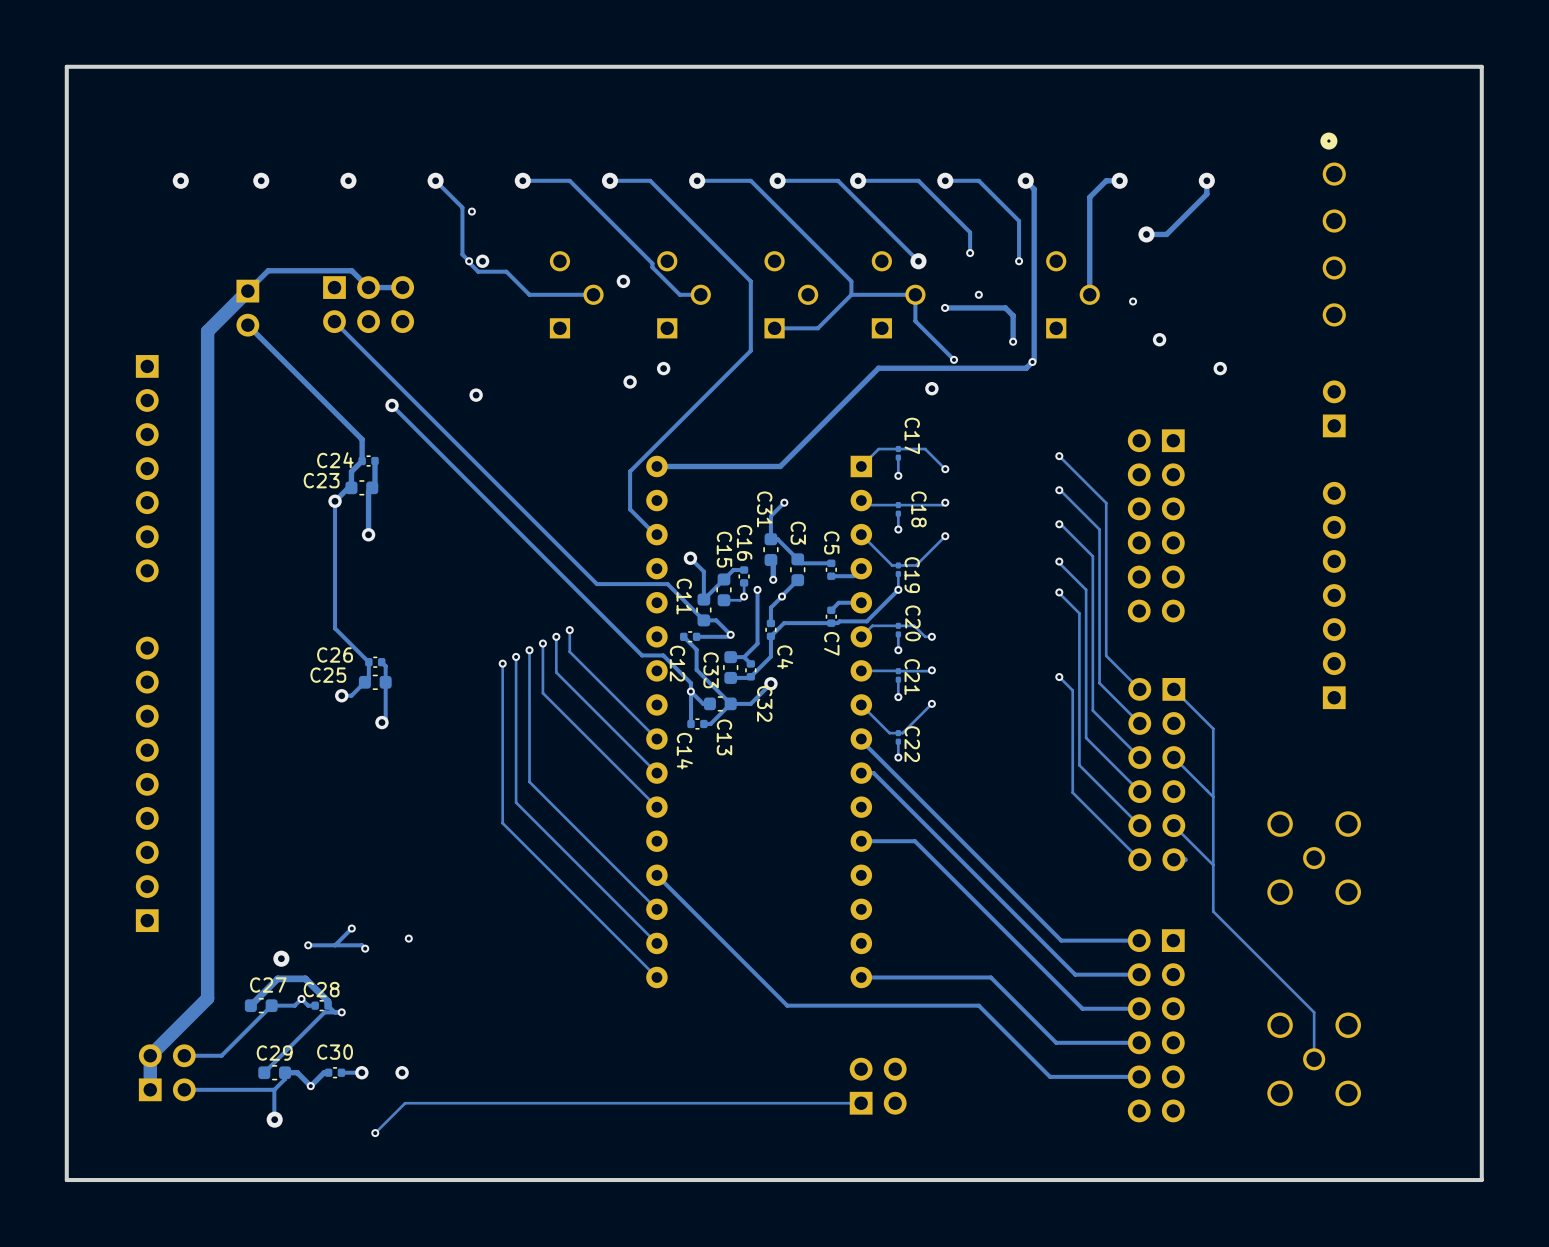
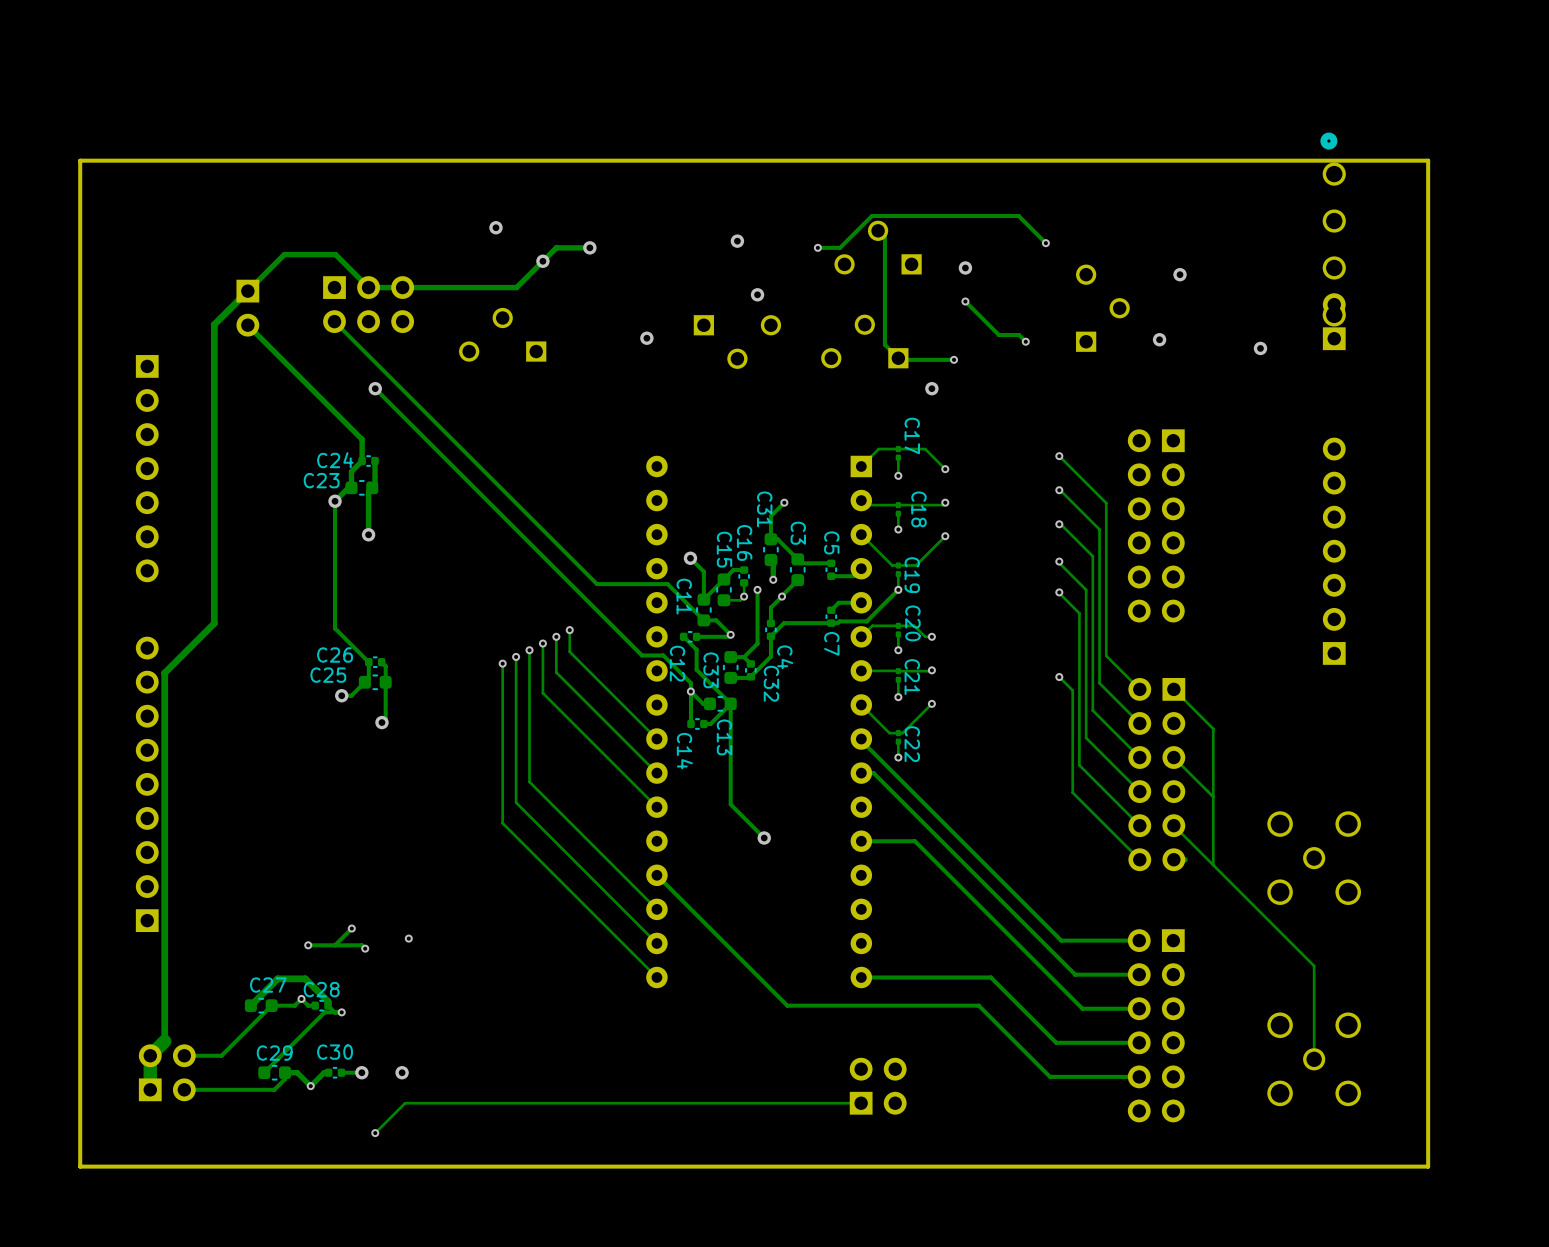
board edge: (1481, 66) (66, 66) (66, 1180) (1481, 1180) (1481, 66) -> (1428, 160) (1428, 1166) (80, 1166) (80, 160) (1428, 160)
via: (180, 180) -> none
via: (261, 180) -> none
via: (348, 180) -> none
track: (435, 180) (462, 207) (462, 254) (478, 271) (506, 271) (529, 294) (593, 294) -> none
via: (435, 180) -> none
track: (522, 180) (569, 180) (652, 263) (652, 267) (679, 294) (700, 294) -> none
via: (522, 180) -> none
track: (609, 180) (650, 180) (750, 281) (750, 350) (630, 471) (630, 509) (656, 534) -> none
via: (609, 180) -> none
track: (697, 180) (750, 180) (851, 281) (851, 294) -> none
via: (697, 180) -> none
track: (777, 180) (838, 180) (918, 261) -> none
via: (777, 180) -> none
track: (858, 180) (918, 180) (970, 232) (970, 253) -> none
via: (858, 180) -> none
track: (945, 180) (978, 180) (1019, 221) (1019, 261) -> none
via: (945, 180) -> none
track: (1025, 180) (1034, 189) (1034, 360) (1026, 368) (878, 368) (780, 466) (656, 466) -> none
via: (1025, 180) -> none
track: (1119, 180) (1106, 180) (1089, 197) (1089, 294) -> none
via: (1119, 180) -> none
track: (1206, 180) (1206, 194) (1166, 234) (1146, 234) -> none
via: (1206, 180) -> none
via: (471, 211) -> none
via: none -> (495, 227)
via: (1146, 234) -> none
via: none -> (737, 241)
track: none -> (1045, 243) (1018, 216) (871, 216) (840, 247) (817, 247)
track: none -> (589, 247) (556, 247) (516, 287) (402, 287)
via: none -> (589, 247)
via: none -> (817, 247)
part: none -> (878, 247)
via: (970, 253) -> none
via: (469, 261) -> none
via: (482, 261) -> none
via: none -> (542, 261)
via: (918, 261) -> none
via position: (1019, 261) -> (1045, 243)
via: none -> (965, 267)
track: (351, 270) (268, 270) -> (351, 270) (335, 254) (284, 254) (268, 270)
via: none -> (1180, 274)
via: (623, 281) -> none
track width: thick (247, 291) (214, 324) -> thin (247, 291) (214, 324)
part: (576, 294) -> none
part: (684, 294) -> none
via: none -> (757, 294)
part: (791, 294) -> none
track: (851, 294) (915, 294) (915, 321) (954, 359) -> (878, 230) (884, 237) (884, 344) (899, 359) (954, 359)
track: (851, 294) (817, 328) (774, 328) -> none
part: (898, 294) -> none
via: (978, 294) -> none
part position: (1072, 294) -> (1102, 308)
track: none -> (965, 301) (998, 335) (1019, 335) (1025, 341)
via: none -> (965, 301)
via: (1133, 301) -> none
track: (945, 307) (1005, 307) (1013, 315) (1013, 341) -> none
via: (945, 307) -> none
track: (214, 324) (207, 331) (207, 998) (164, 1041) -> (214, 324) (214, 623) (164, 673) (164, 1041)
part: none -> (502, 334)
via: none -> (646, 338)
part: none -> (864, 341)
via: (1013, 341) -> none
via: none -> (1025, 341)
part: none -> (737, 342)
via: (1032, 361) -> none
via: (663, 368) -> none
via position: (1220, 368) -> (1260, 348)
via: (630, 381) -> none
track: none -> (375, 388) (392, 405)
via: (476, 395) -> none
via position: (392, 405) -> (375, 388)
part position: (1334, 408) -> (1334, 321)
part position: (1334, 595) -> (1334, 551)
track: (770, 683) (750, 703) (730, 703) -> (764, 838) (730, 804) (730, 703)
via: (770, 683) -> none
C32 name position: C32 (764, 703) -> C32 (771, 683)
via: none -> (764, 838)
track: (1213, 865) (1213, 911) (1314, 1012) -> (1213, 865) (1314, 965) (1314, 1012)
via: (281, 958) -> none
track: (274, 1089) (274, 1119) -> none
via: (274, 1119) -> none

